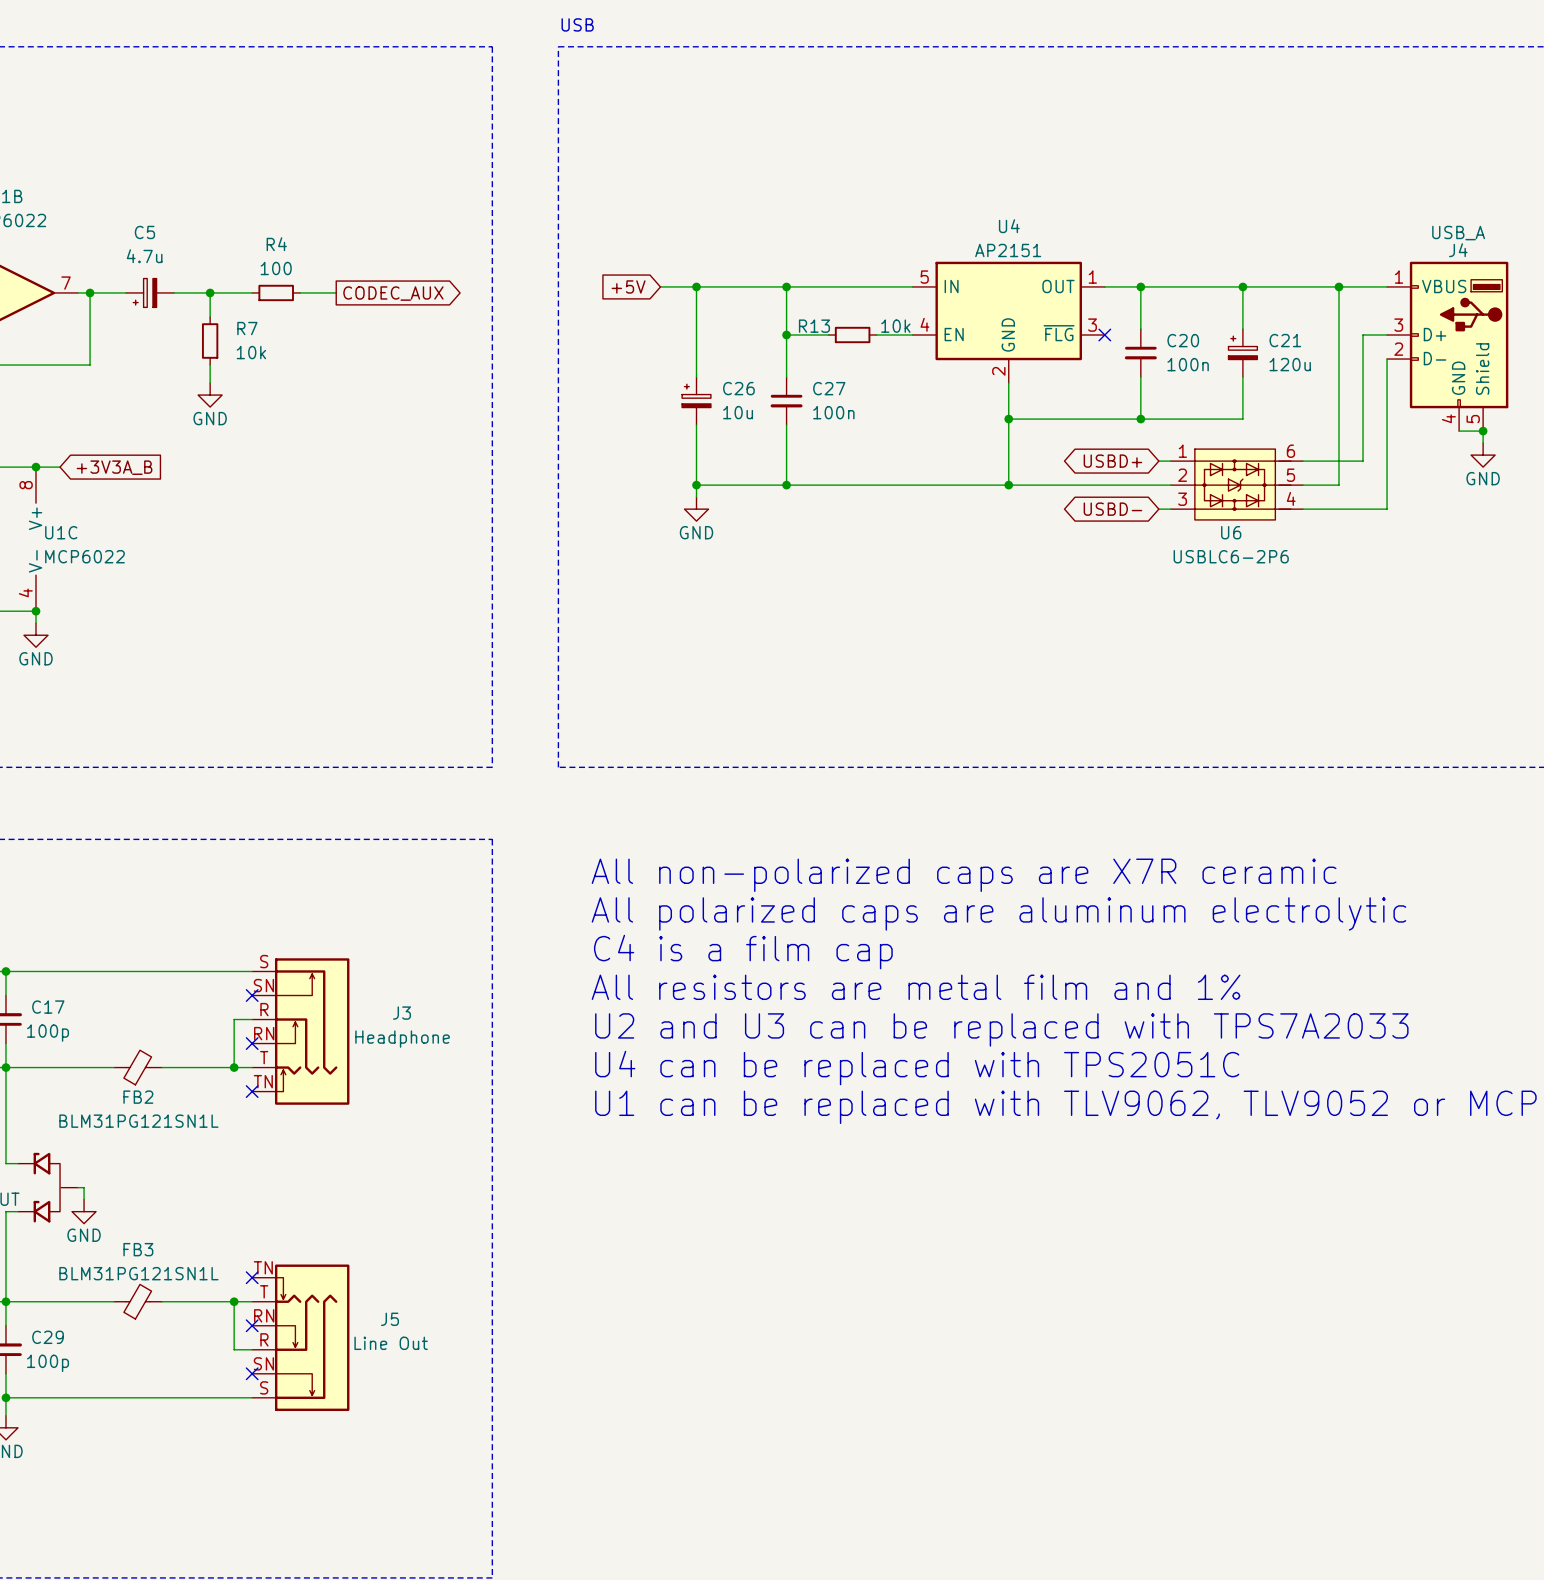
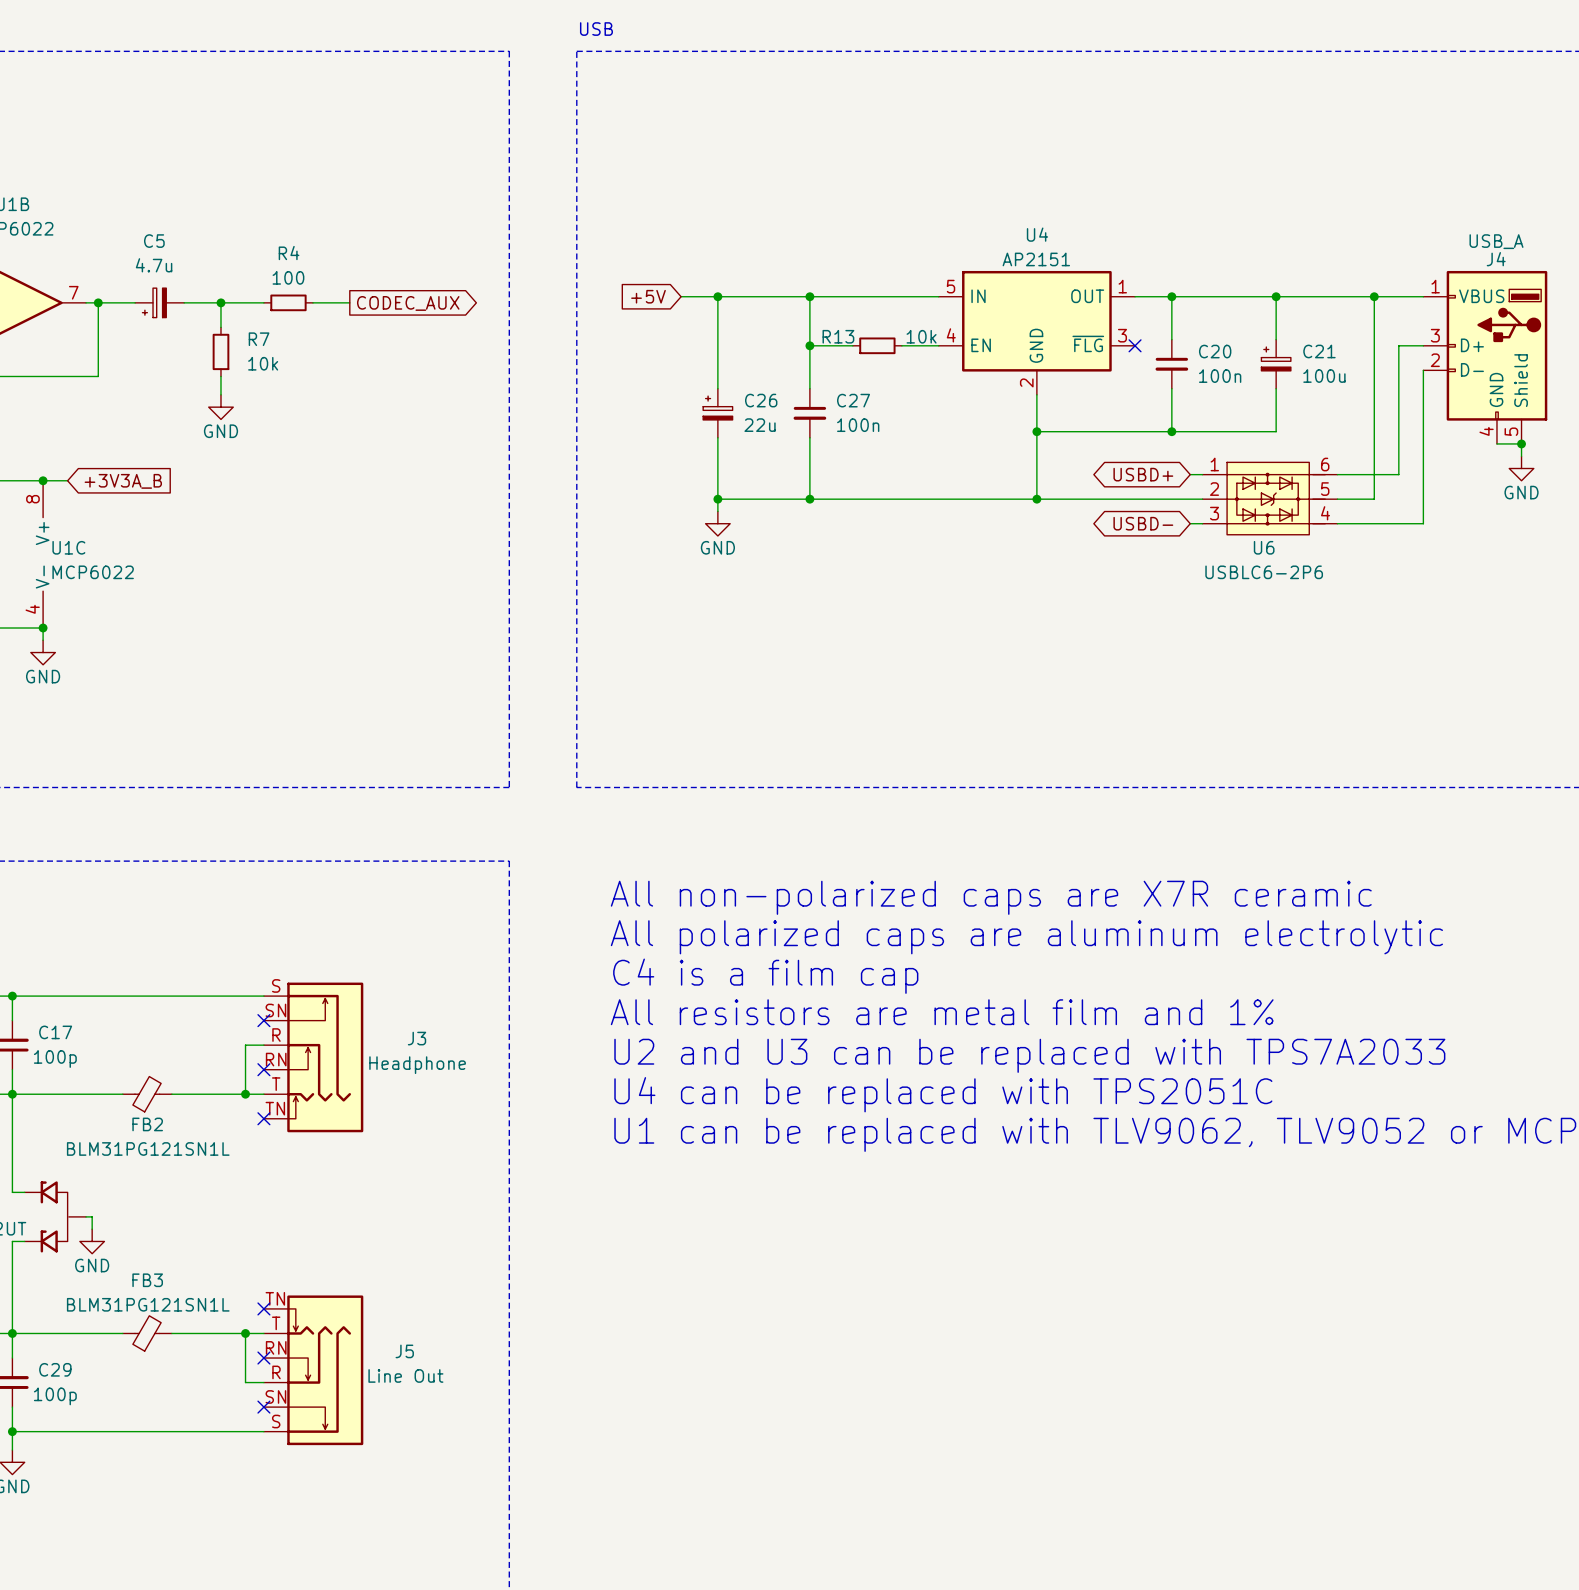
C21 value: 120u (1290, 364) -> 100u (1324, 376)
C26 value: 10u (738, 412) -> 22u (760, 425)

